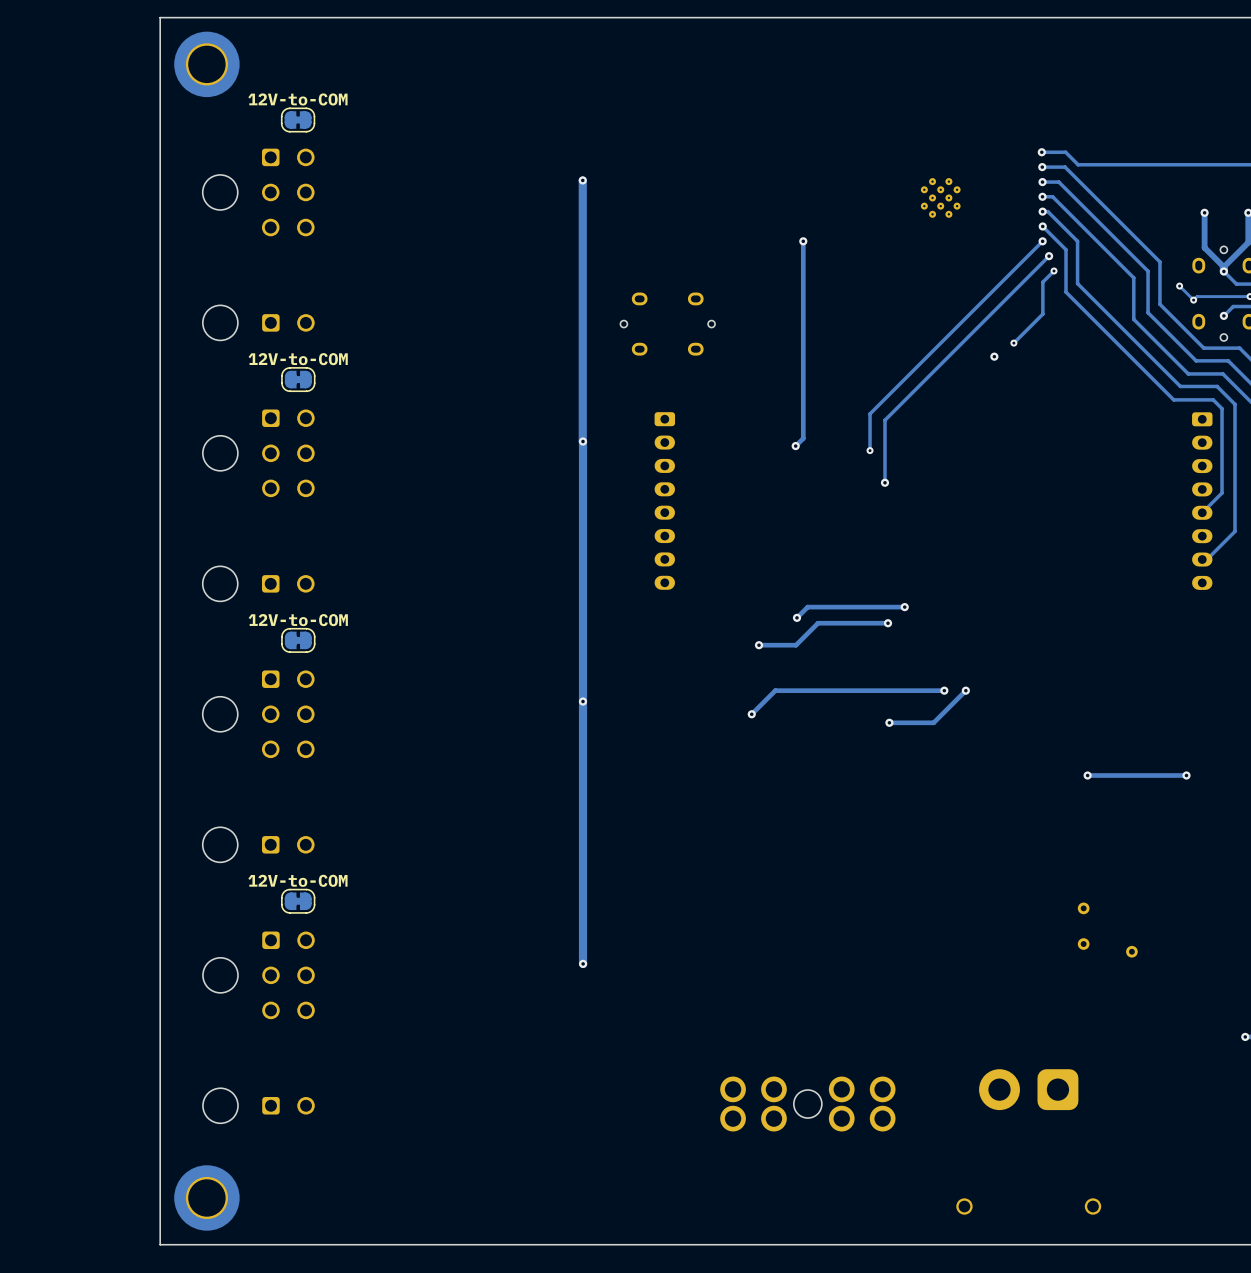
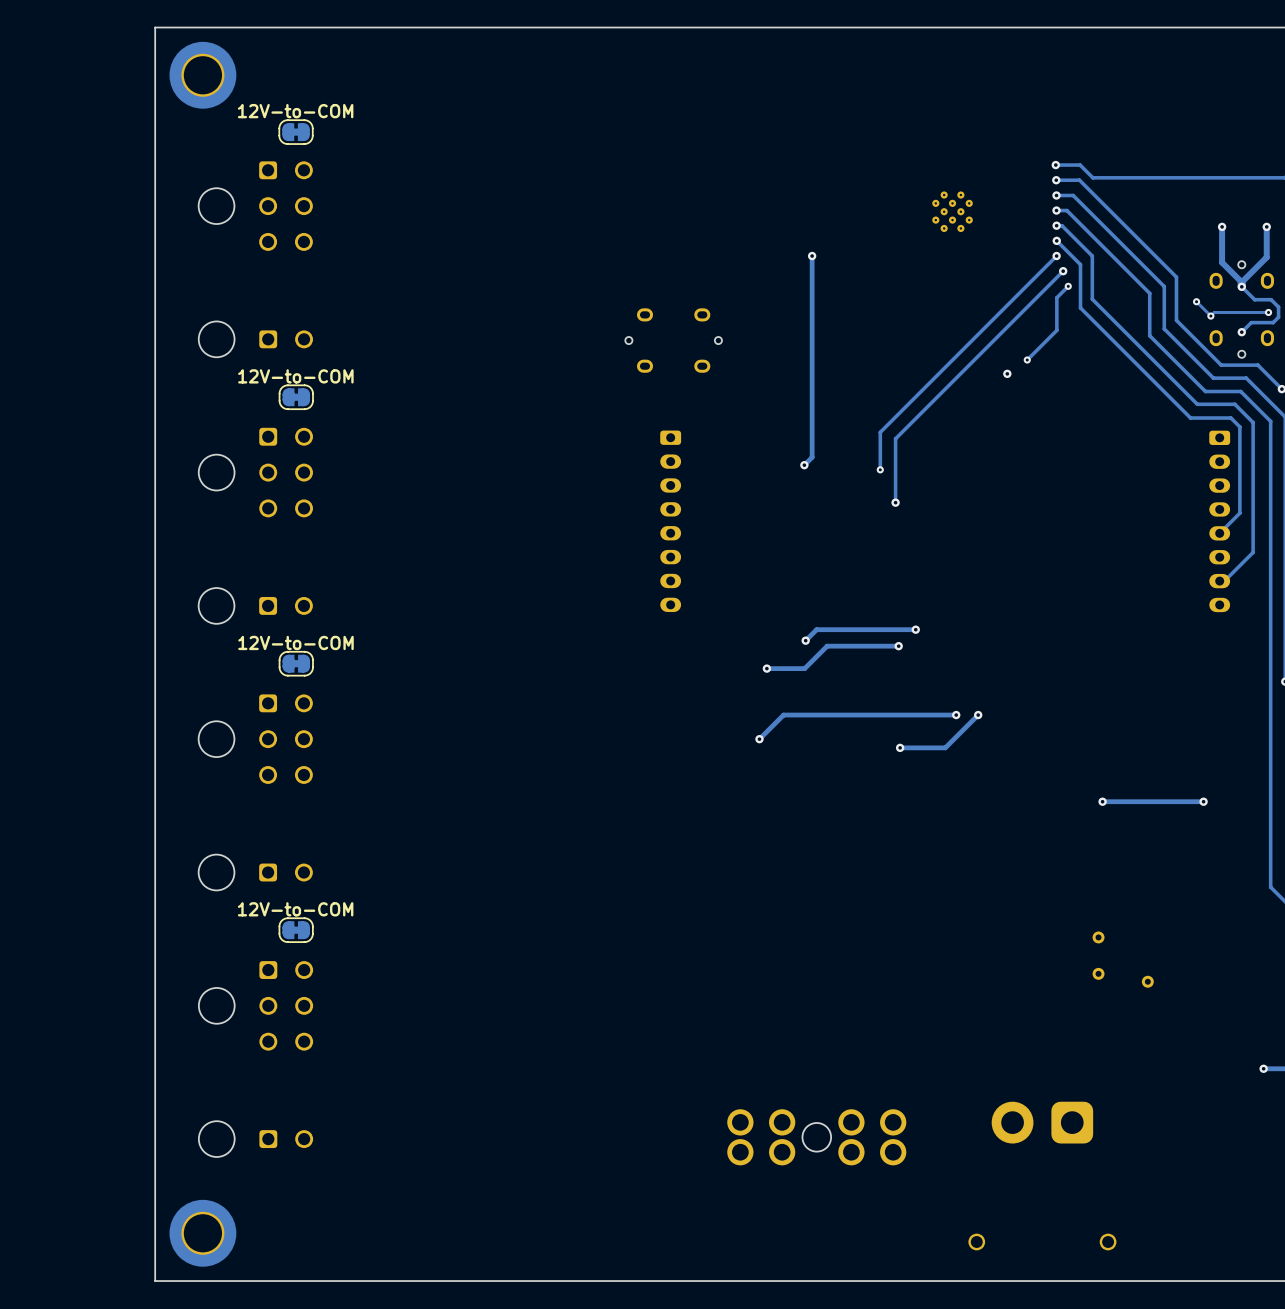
track: (582, 180) (583, 963) -> none
via: (582, 180) -> none
via: (583, 441) -> none
via: (583, 701) -> none
via: (583, 963) -> none

